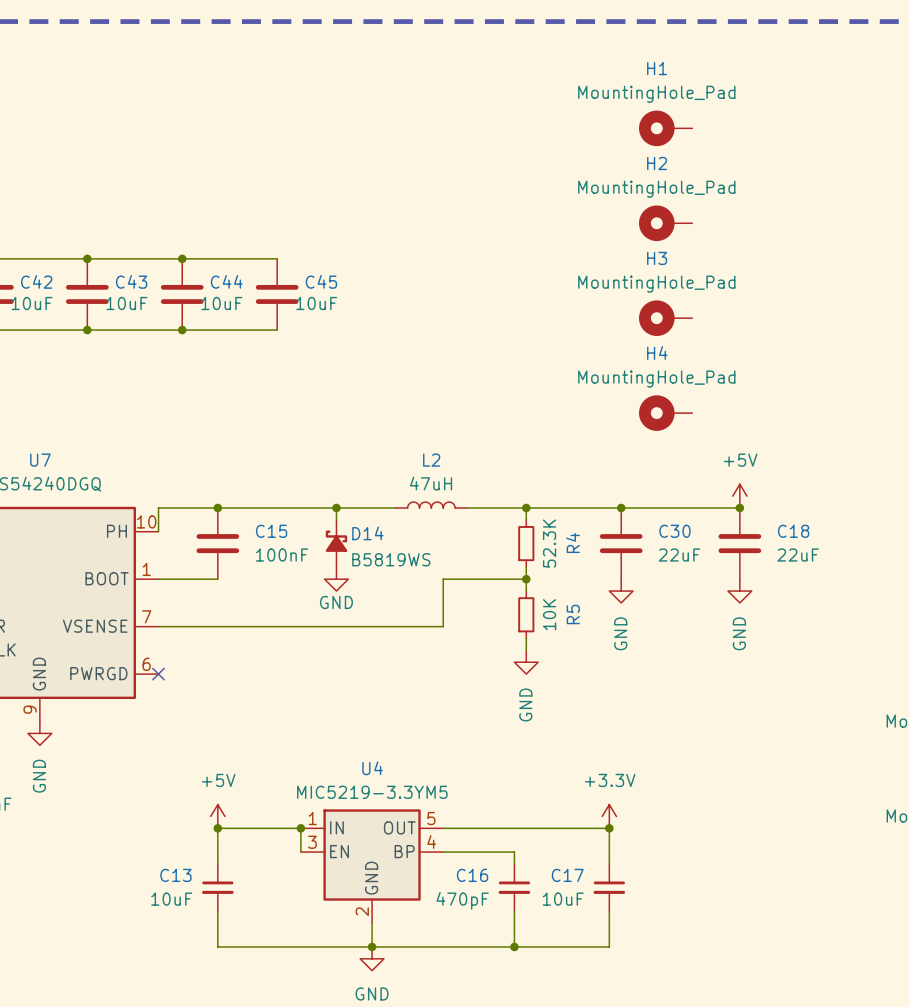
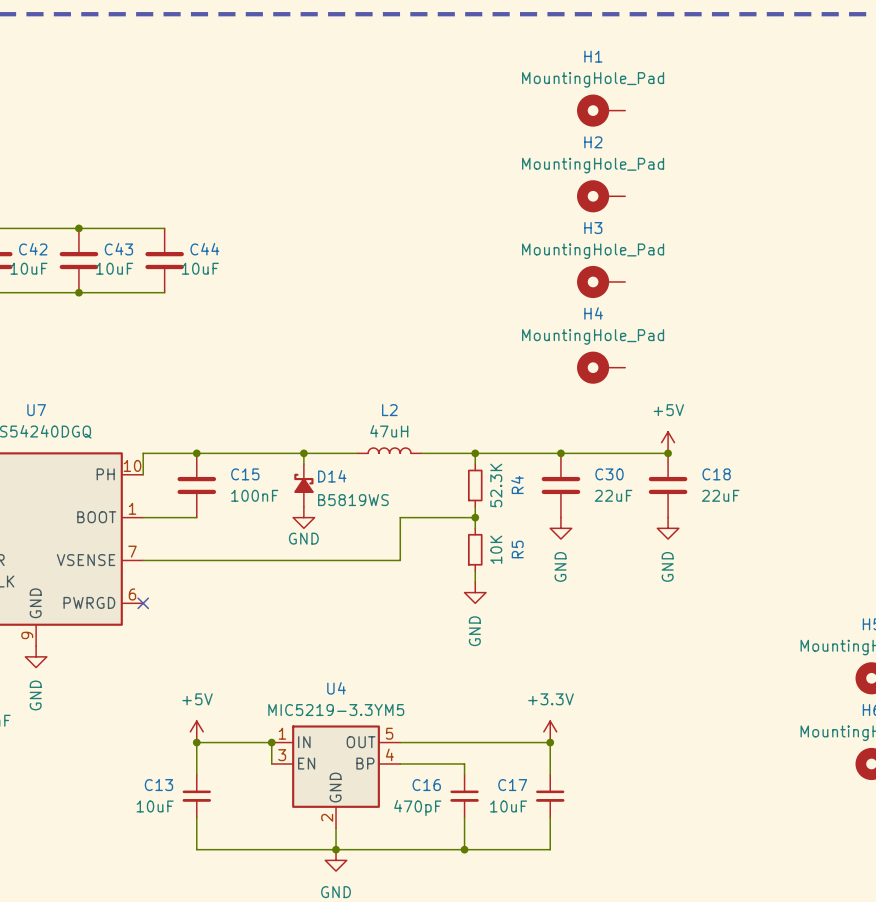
wire: (182, 258) (277, 258) -> none
junction: (182, 258) -> none
C45: 10uF (277, 294) -> none
wire: (182, 330) (277, 330) -> none
junction: (182, 330) -> none

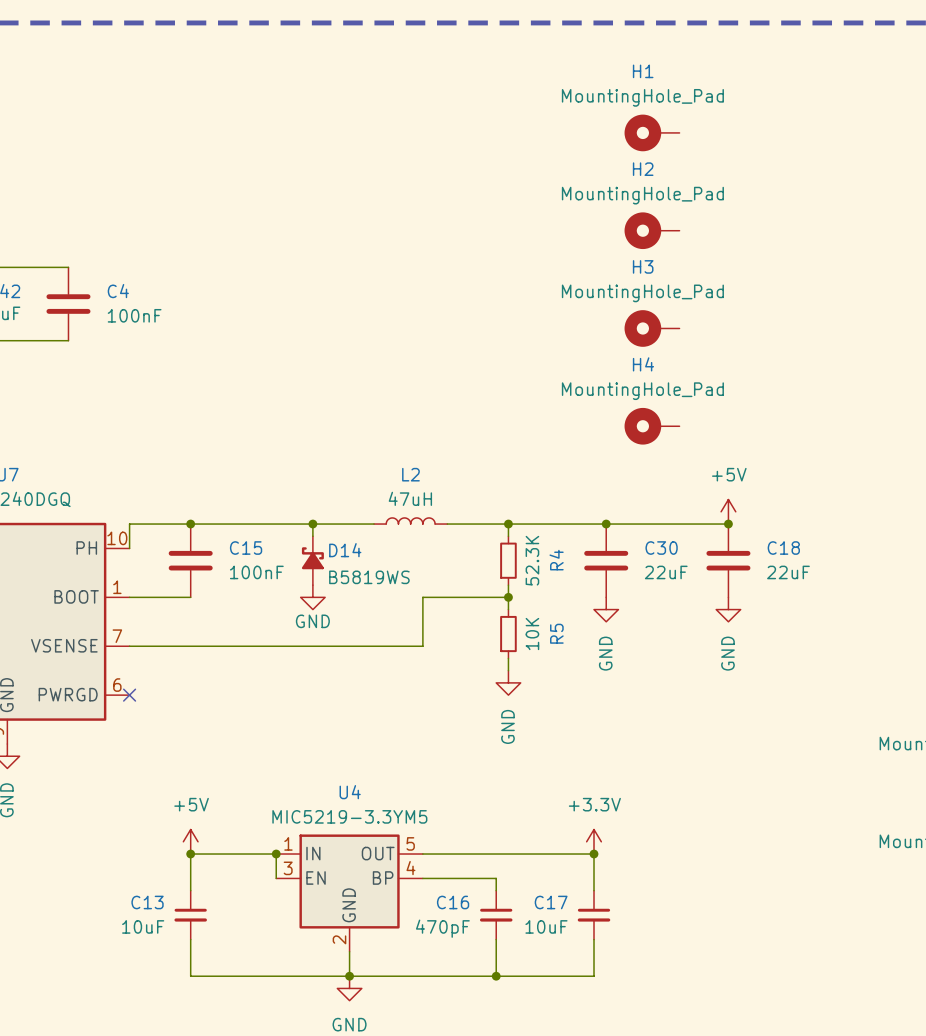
junction: (78, 228) -> none
wire: (89, 228) (164, 228) -> none
C43: 10uF (78, 260) -> none
C4: none -> 100nF (68, 304)
C44: 10uF (164, 260) -> none
junction: (78, 292) -> none
wire: (89, 292) (164, 292) -> none

